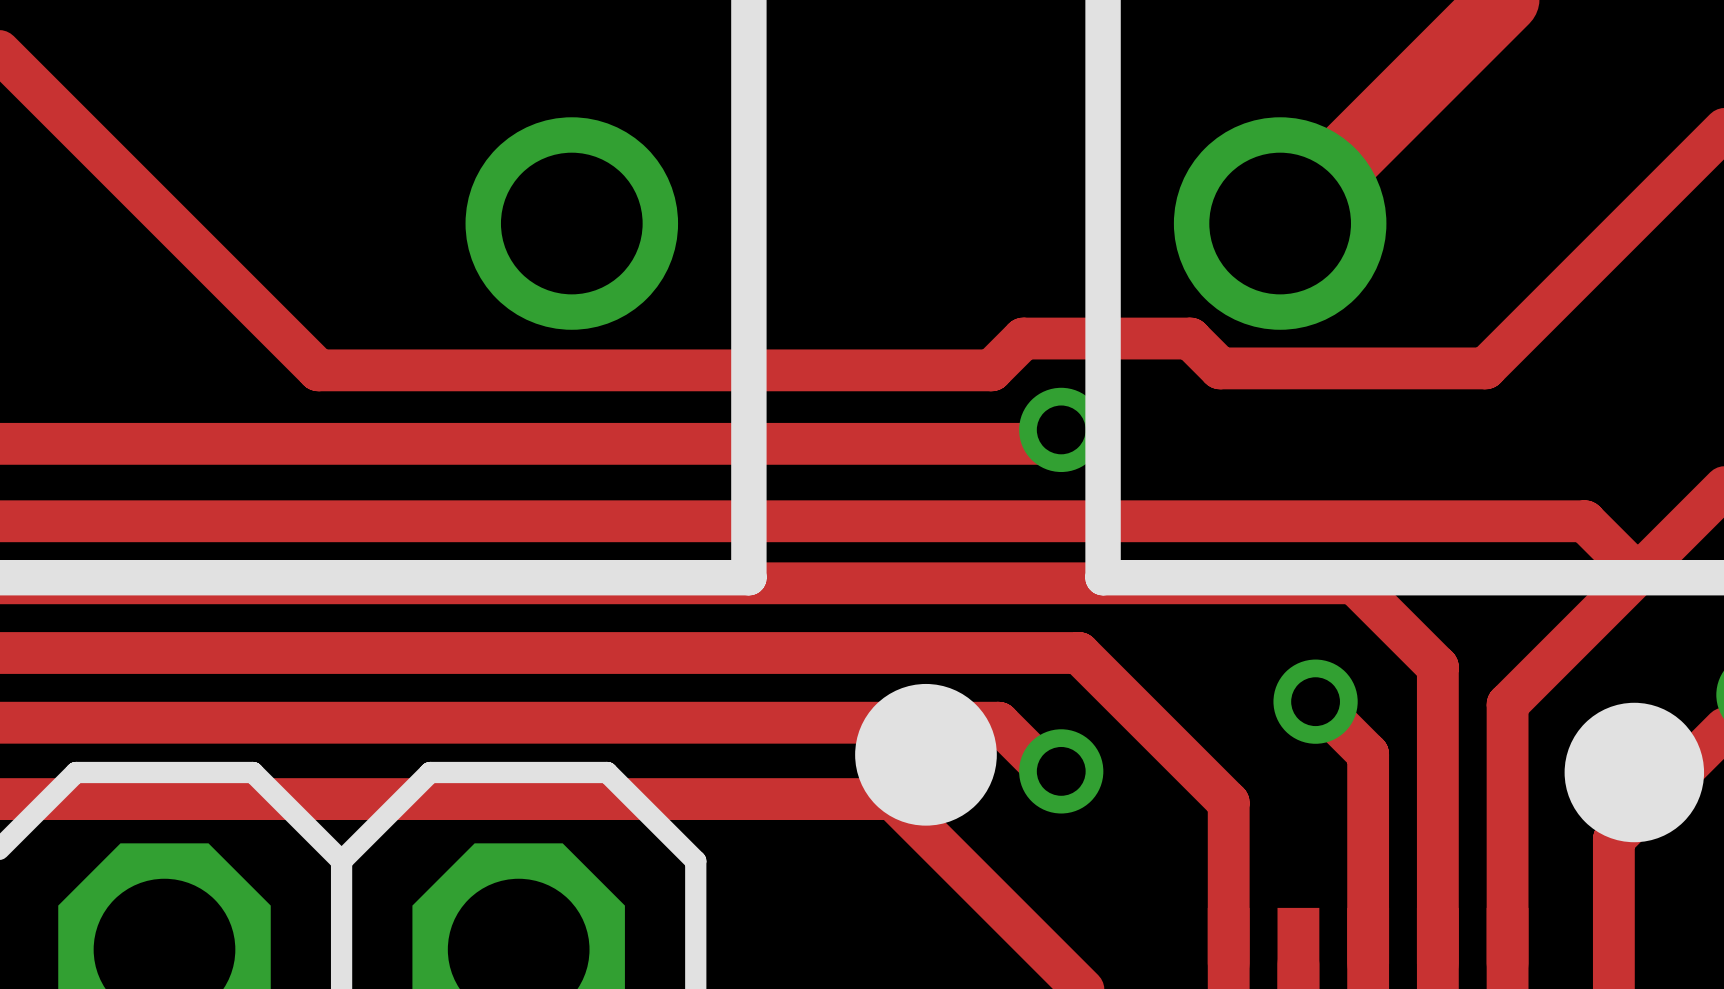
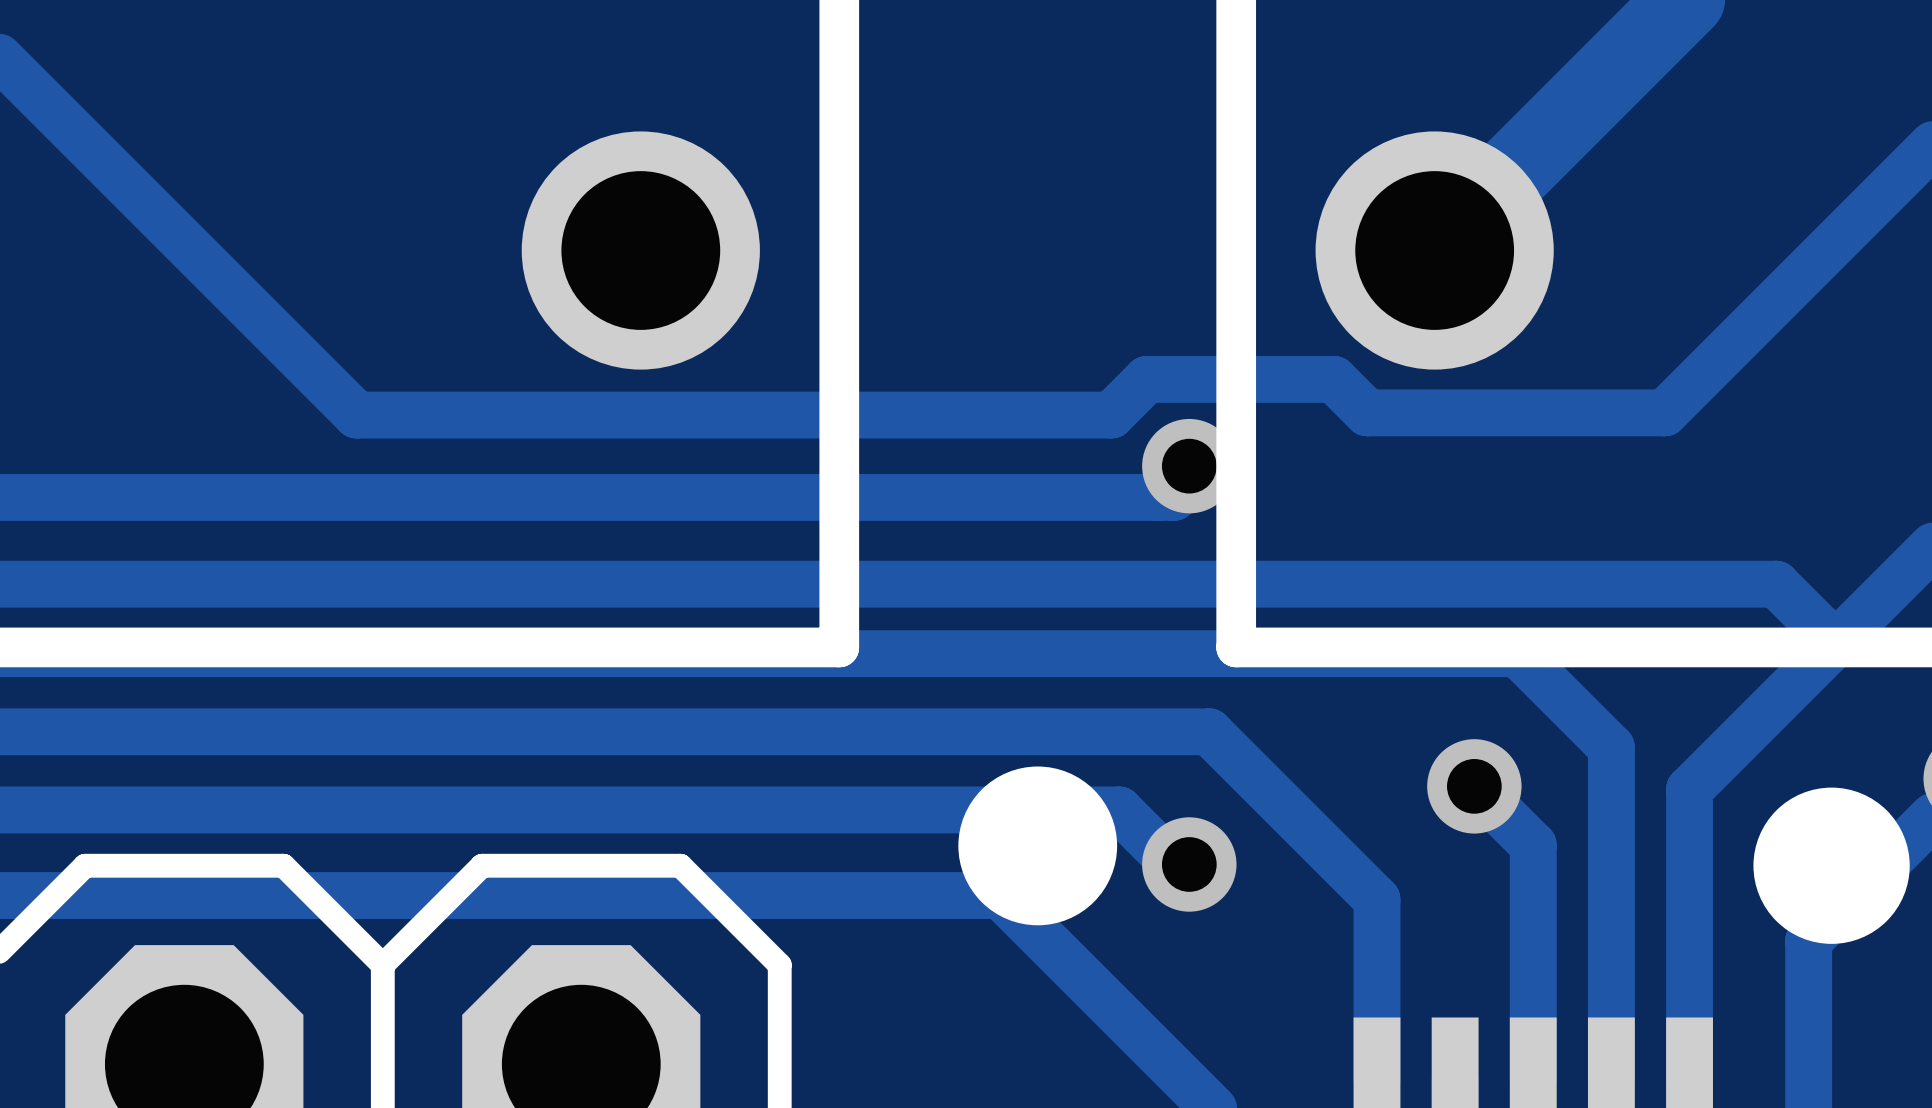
via position: (1061, 429) -> (1189, 466)

